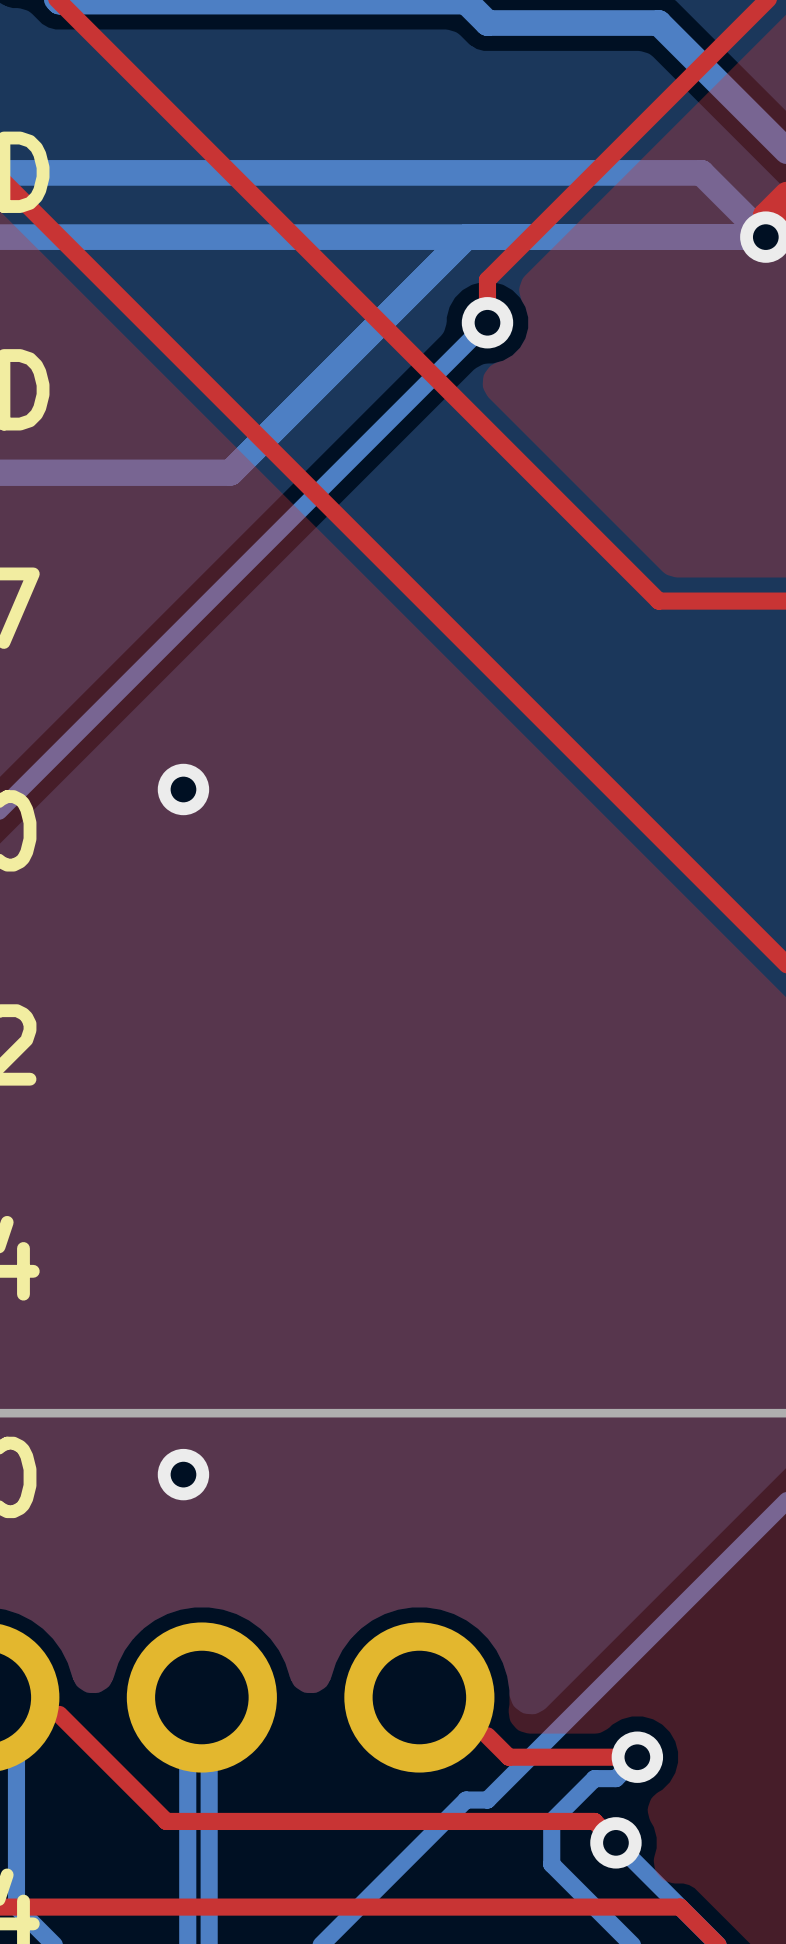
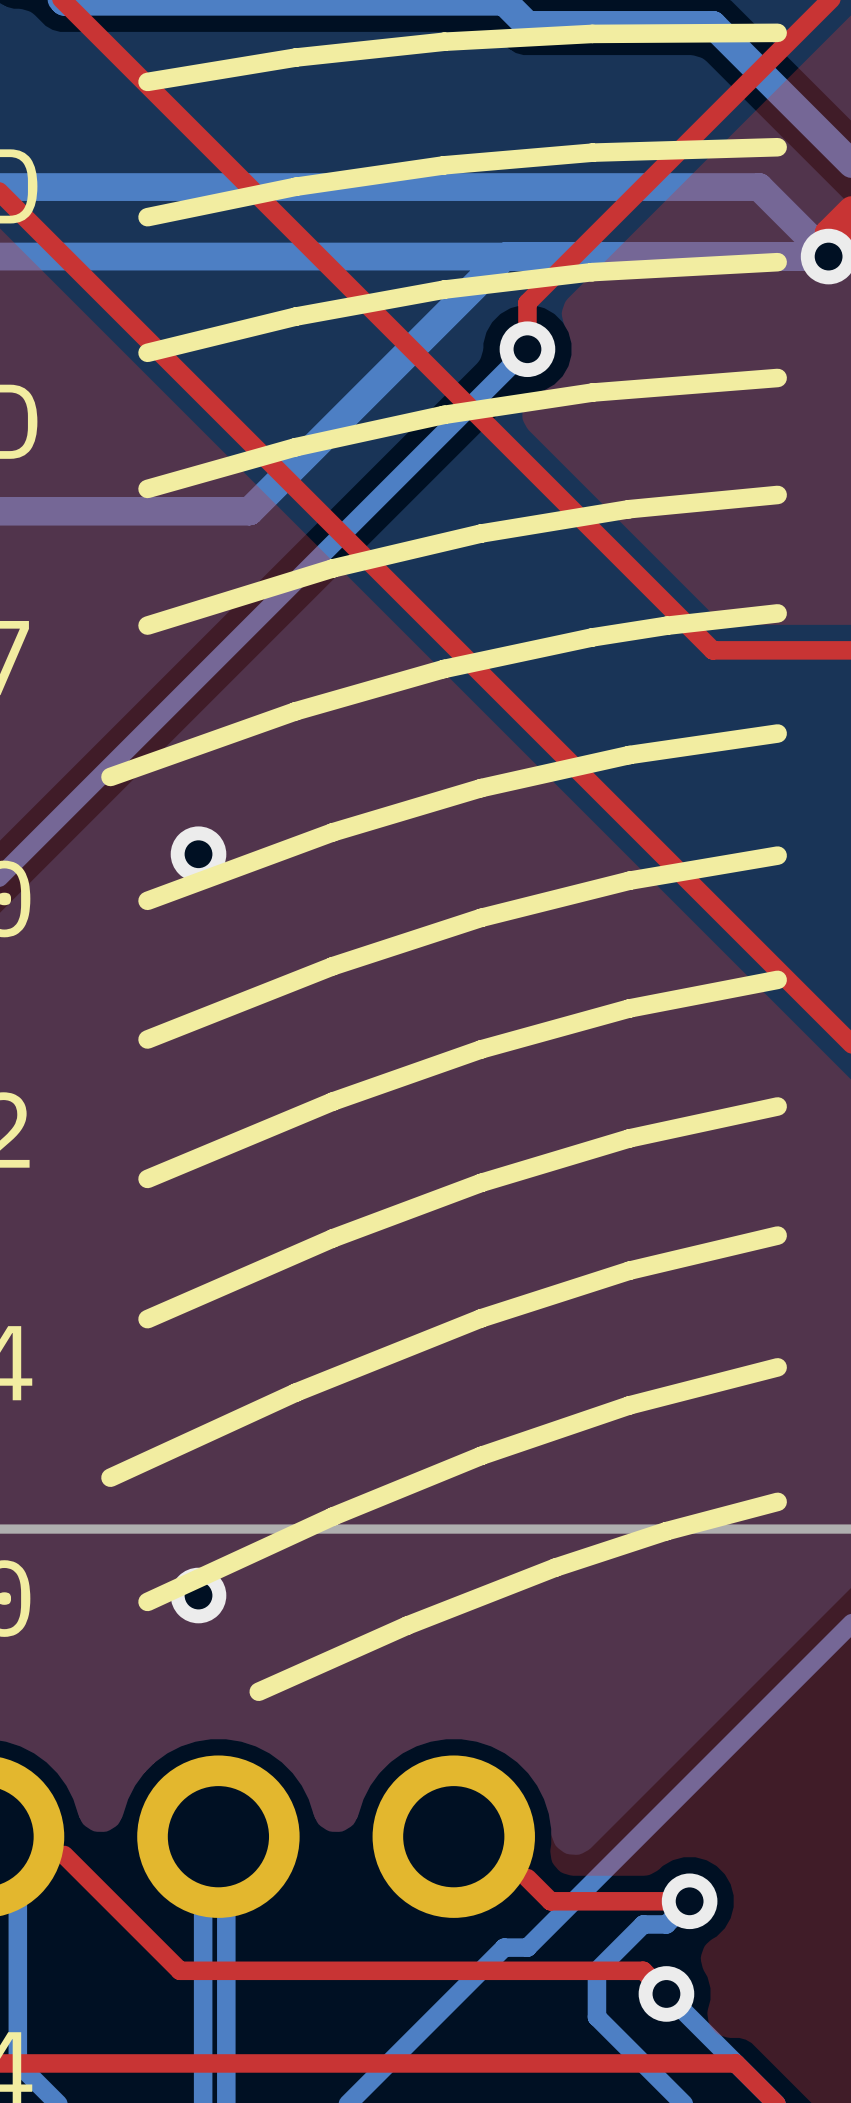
line: none -> (777, 32) (592, 33) (444, 41) (295, 57) (147, 81)
line: none -> (777, 147) (592, 152) (444, 165) (295, 186) (147, 217)
line: none -> (777, 262) (592, 272) (444, 289) (295, 316) (147, 352)
line: none -> (777, 377) (592, 392) (444, 414) (295, 447) (147, 488)
line: none -> (777, 494) (629, 509) (481, 533) (332, 568) (147, 625)
line: none -> (777, 613) (666, 625) (592, 637) (444, 668) (295, 711) (110, 776)
line: none -> (777, 733) (629, 755) (481, 788) (332, 832) (147, 900)
line: none -> (777, 855) (629, 880) (481, 917) (332, 966) (147, 1039)
line: none -> (777, 979) (629, 1008) (481, 1049) (332, 1101) (147, 1178)
line: none -> (777, 1106) (629, 1138) (481, 1182) (332, 1238) (147, 1319)
line: none -> (777, 1235) (629, 1270) (481, 1318) (295, 1392) (110, 1477)
line: none -> (777, 1367) (629, 1405) (481, 1455) (332, 1516) (147, 1601)
line: none -> (777, 1501) (666, 1531) (555, 1567) (407, 1625) (258, 1691)

